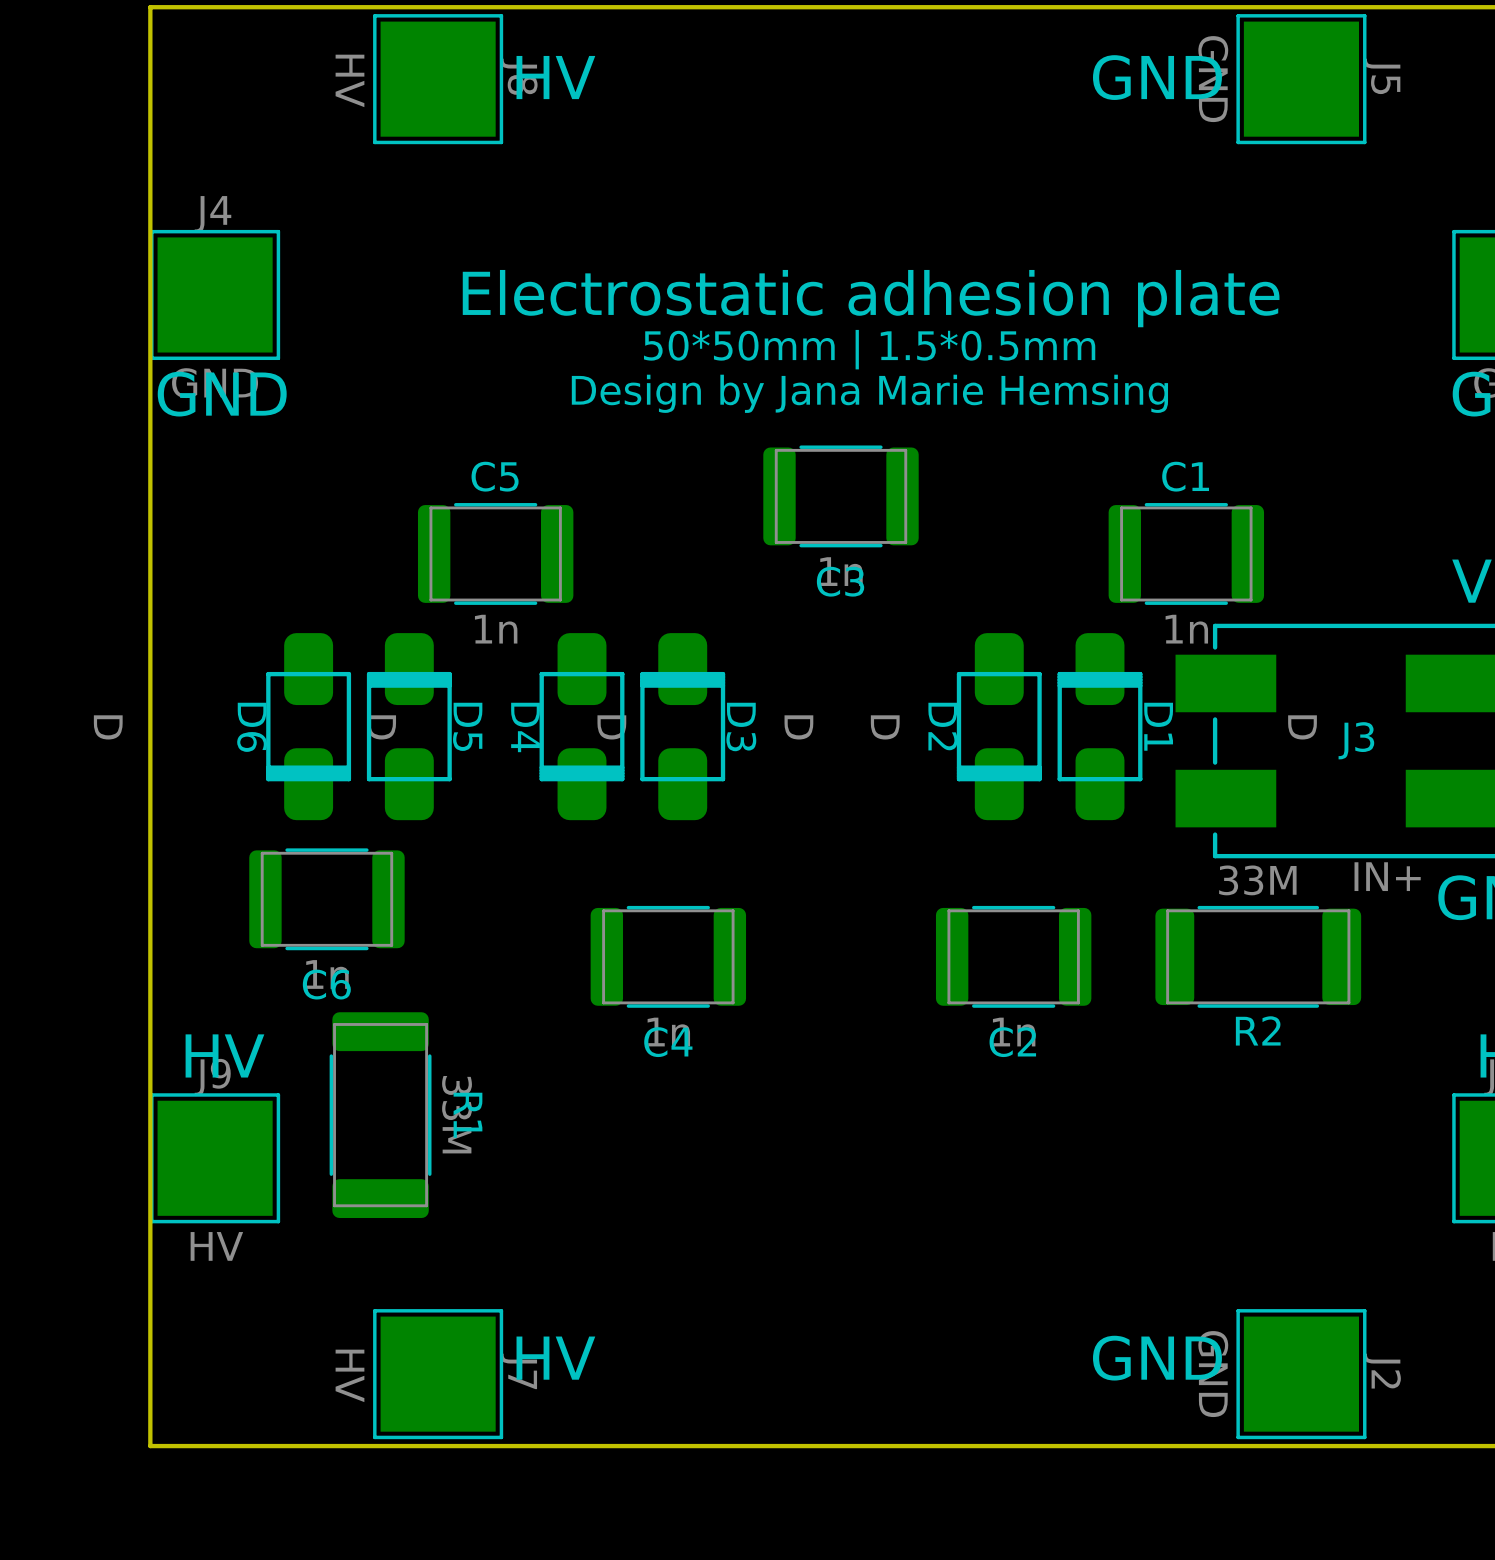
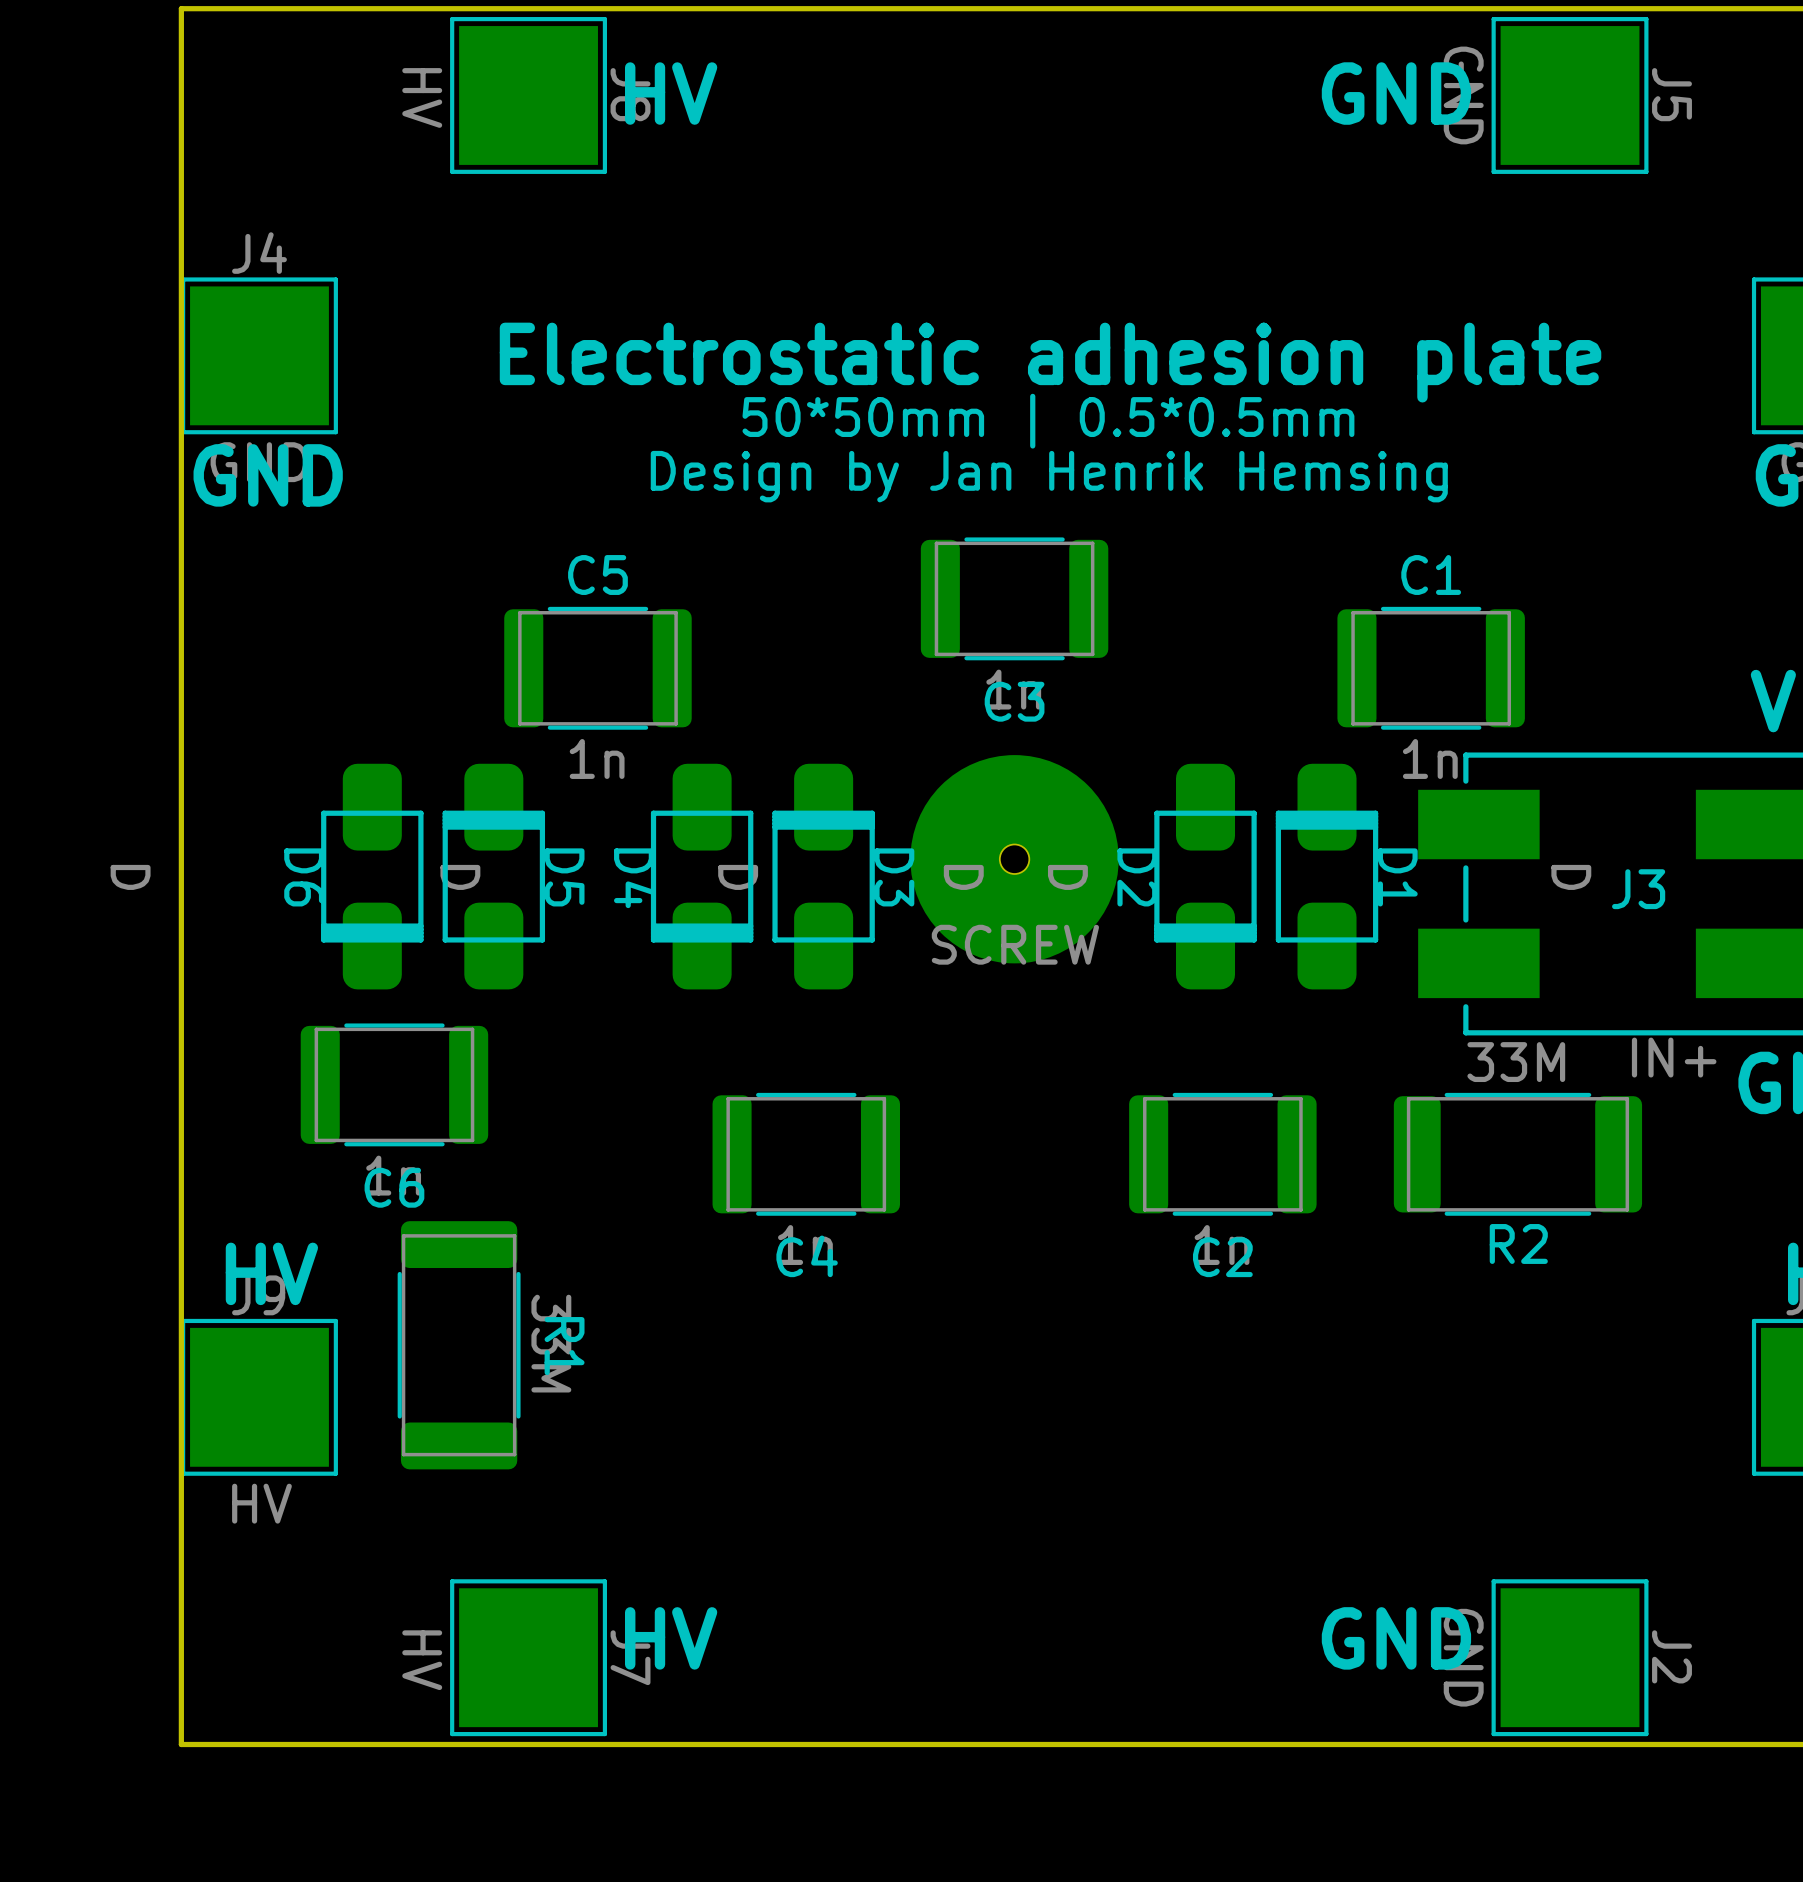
text: 50*50mm | 1.5*0.5mm (869, 349) -> 50*50mm | 0.5*0.5mm (1048, 421)
text: Design by Jana Marie Hemsing (869, 393) -> Design by Jan Henrik Hemsing (1049, 476)
part: none -> SCREW (1014, 859)

